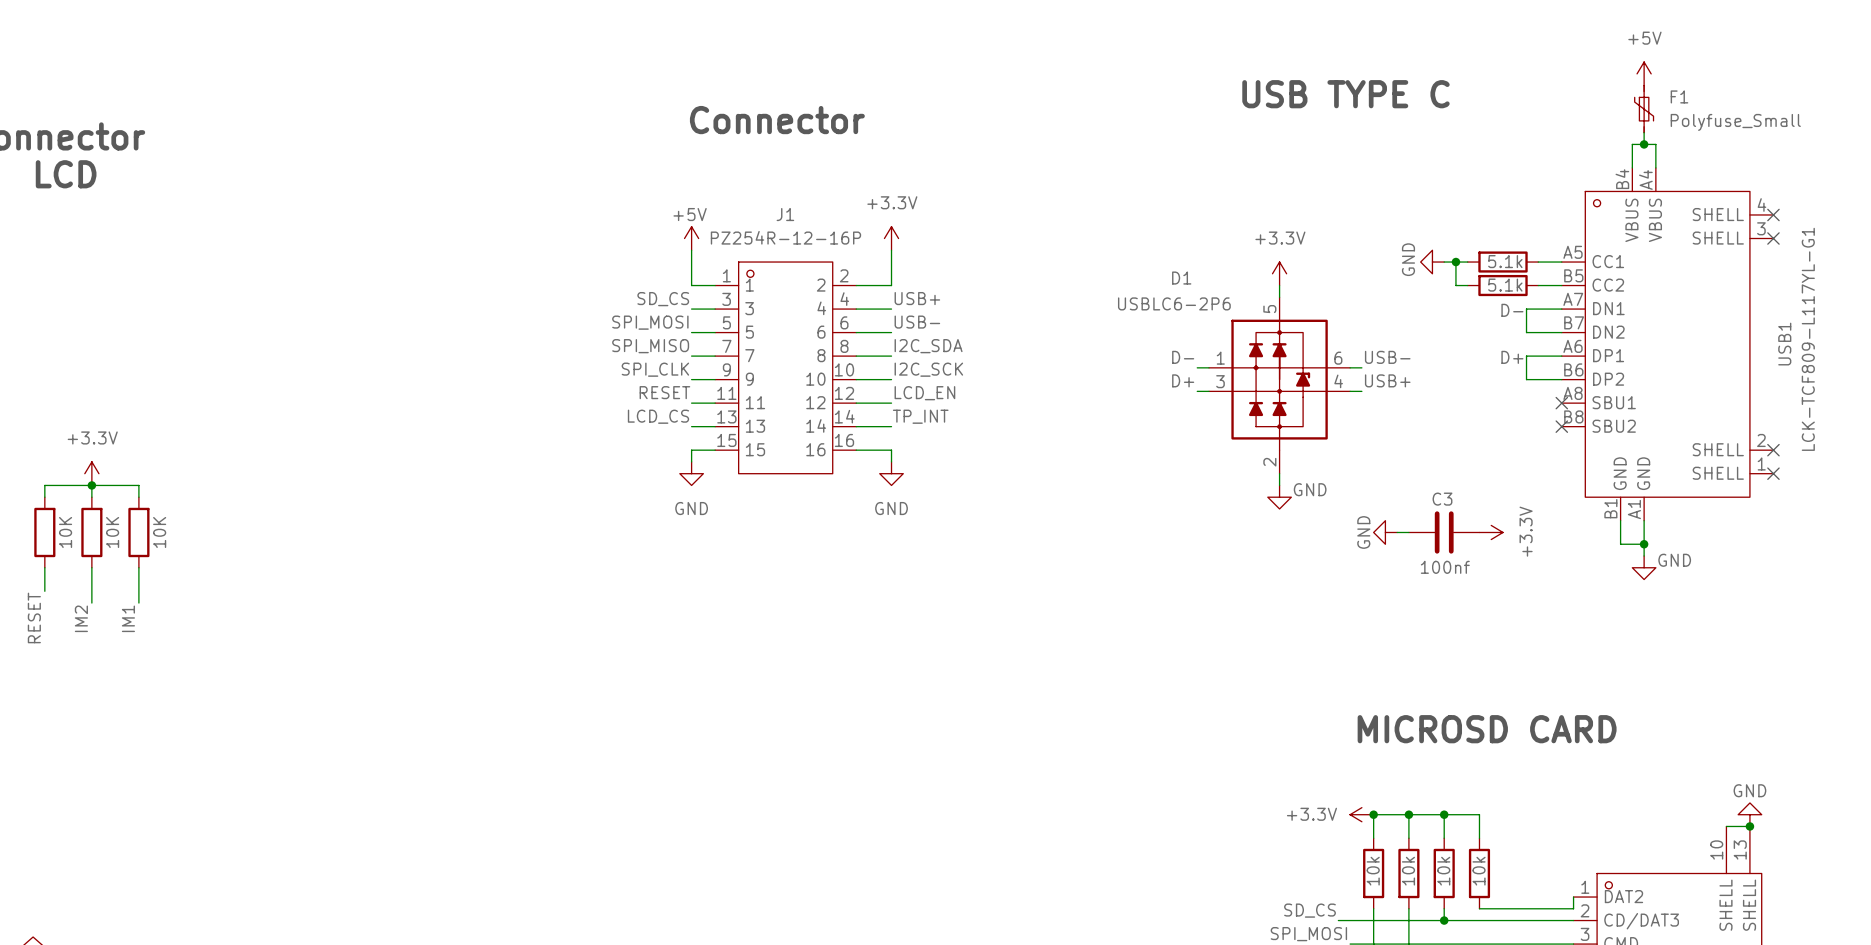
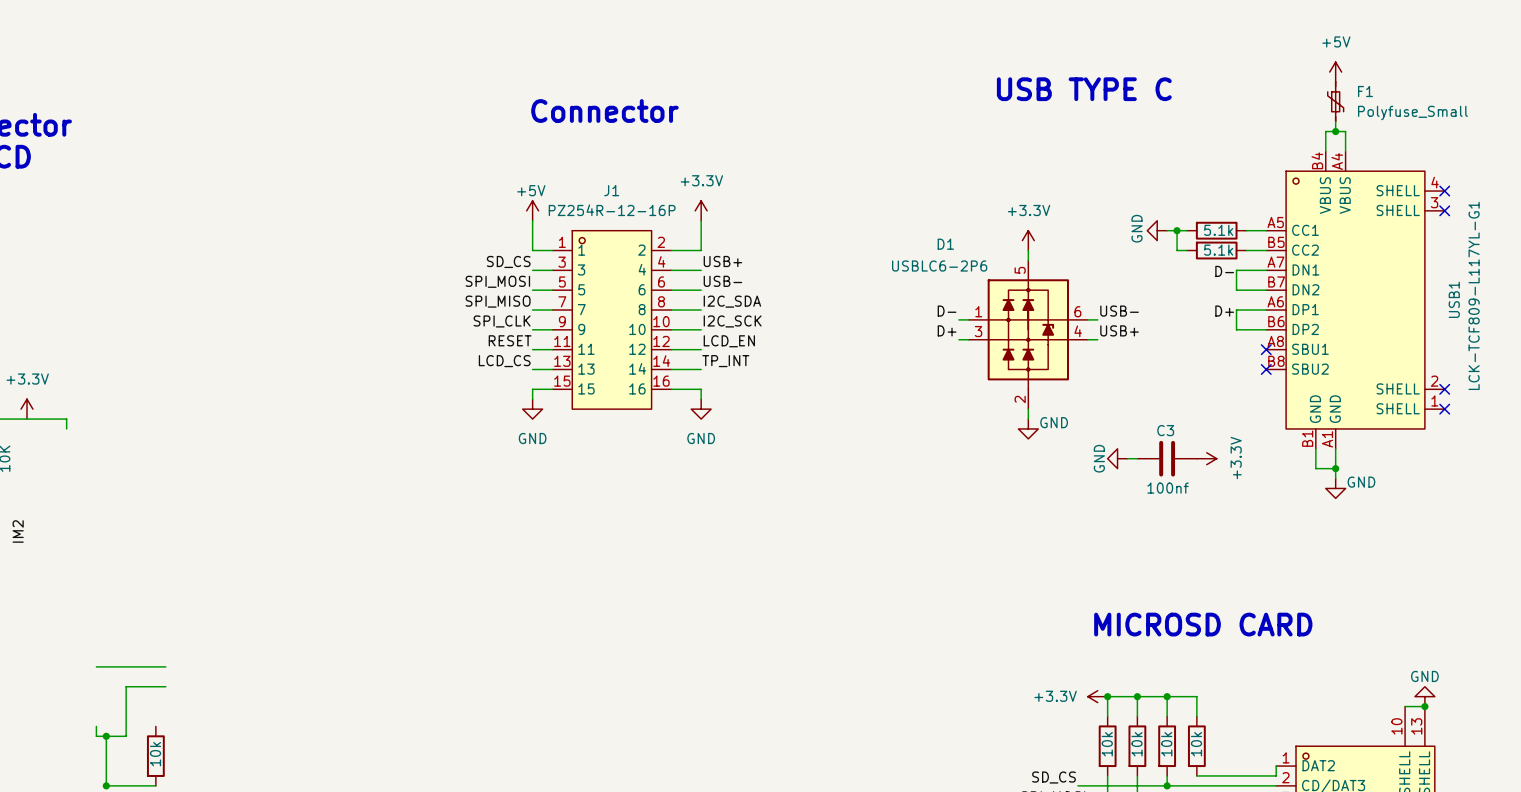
wire: (91, 485) (91, 497) -> none
junction: (91, 485) -> none
part: 10K (91, 532) -> none
part: 10K (138, 532) -> none
wire: (91, 567) (91, 603) -> none
wire: (138, 567) (138, 603) -> none
label: IM1 (128, 618) -> none
wire: none -> (96, 666) (165, 666)
wire: none -> (165, 686) (126, 686) (126, 736) (96, 736) (96, 726)
wire: none -> (106, 736) (106, 785) (155, 785)
junction: none -> (106, 736)
part: none -> 10k (155, 756)
junction: none -> (106, 785)

